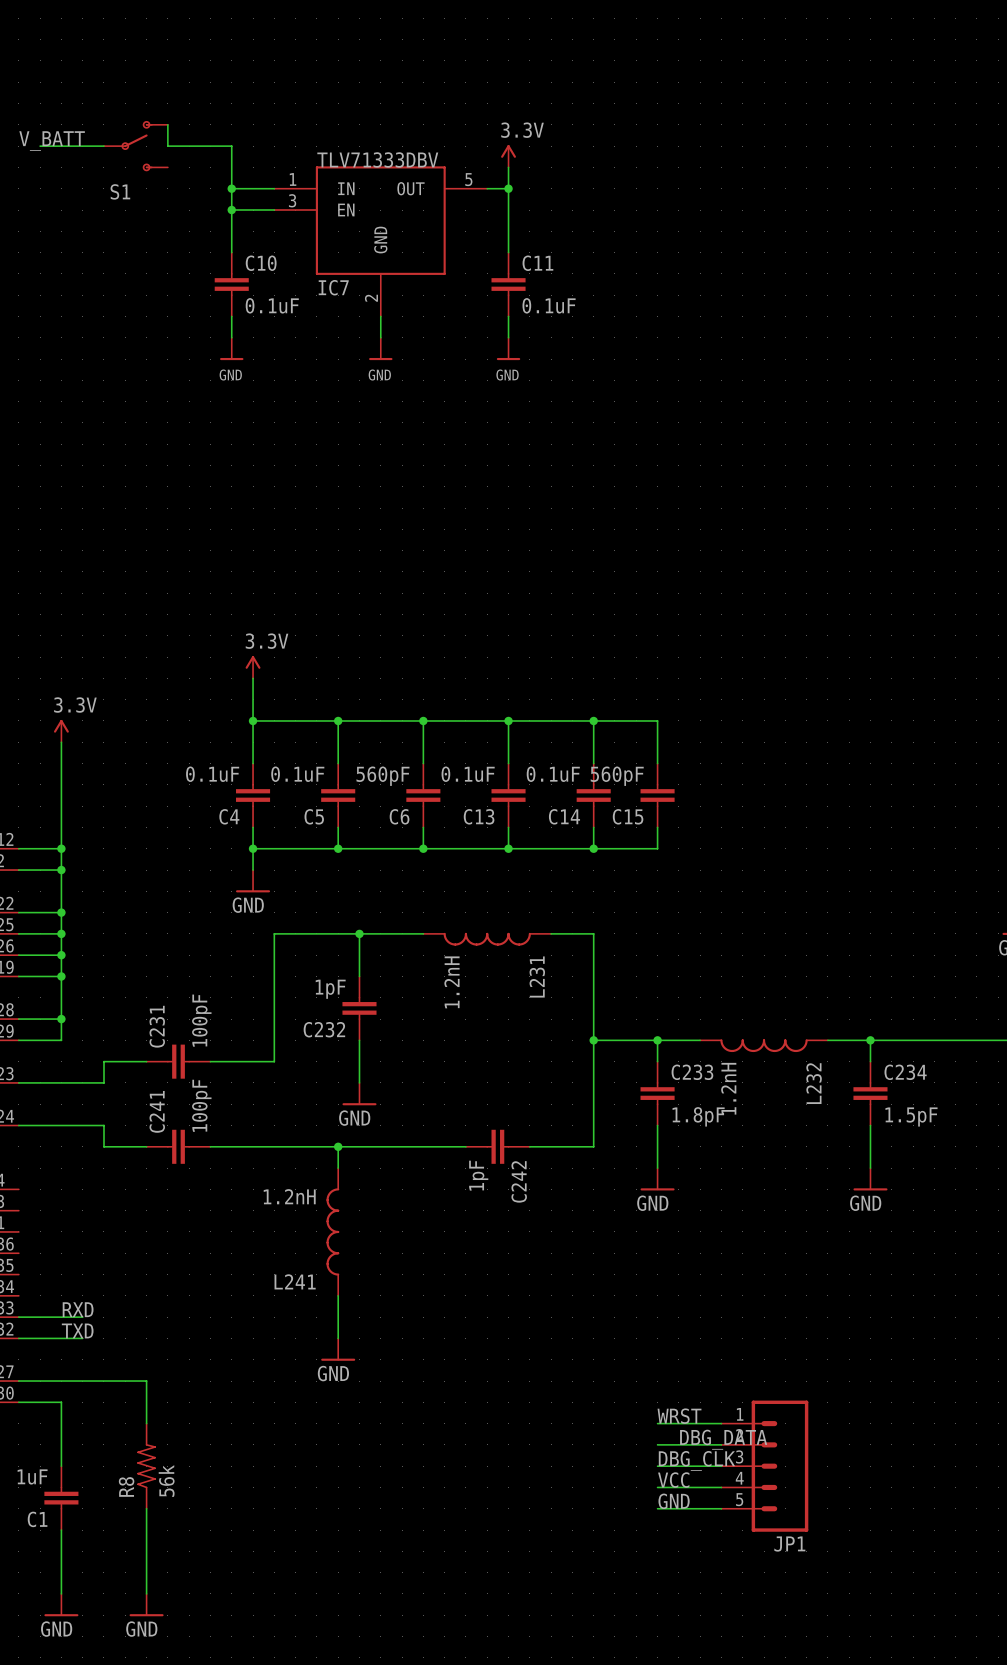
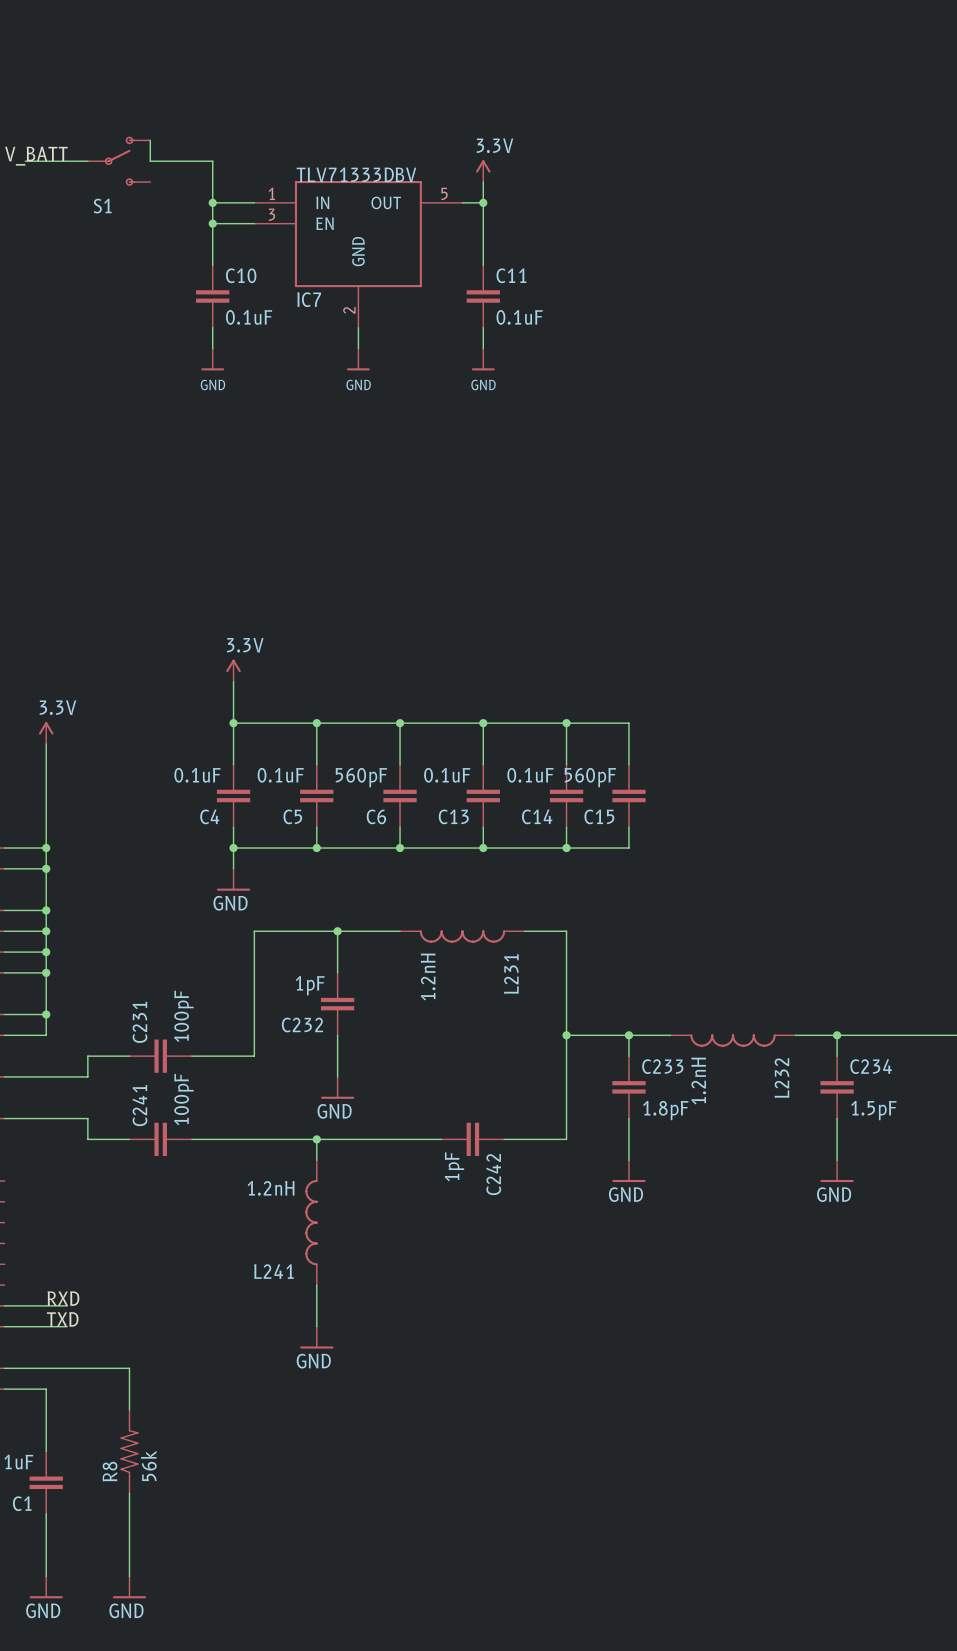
label: WRST (679, 1416) -> none
wire: (657, 1423) (721, 1423) -> none
label: DBG_DATA (723, 1439) -> none
wire: (657, 1444) (721, 1444) -> none
label: DBG_CLK (696, 1461) -> none
wire: (657, 1466) (721, 1466) -> none
JP1: (764, 1466) -> none
label: VCC (673, 1480) -> none
wire: (657, 1487) (721, 1487) -> none
label: GND (674, 1501) -> none
wire: (657, 1508) (721, 1508) -> none

